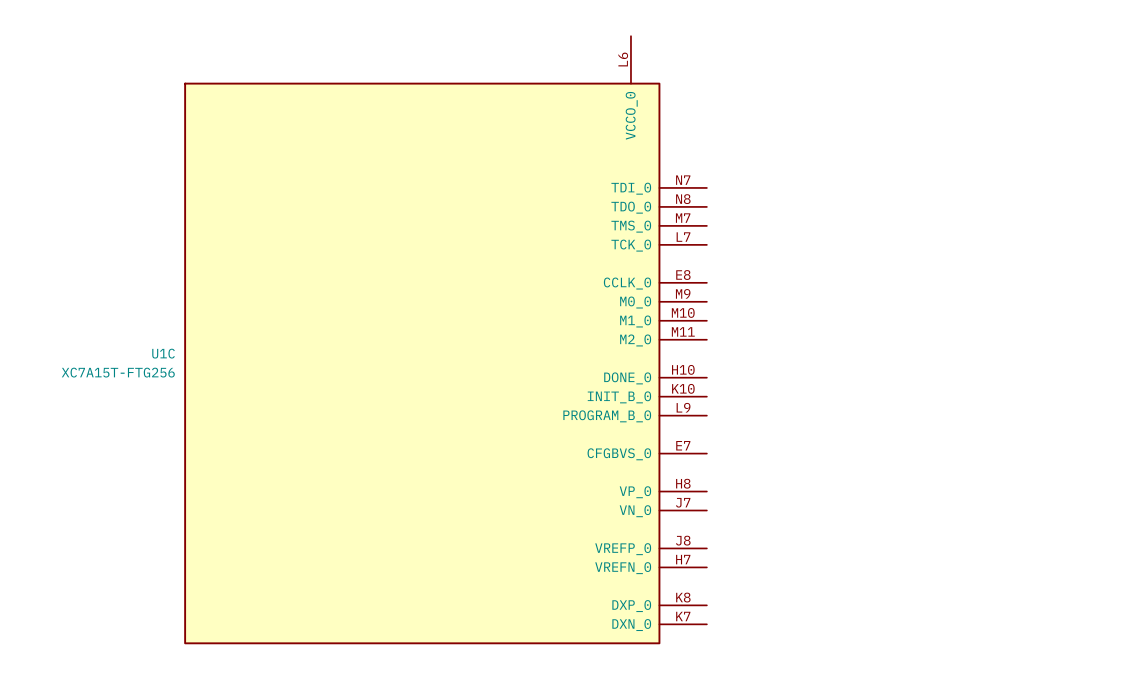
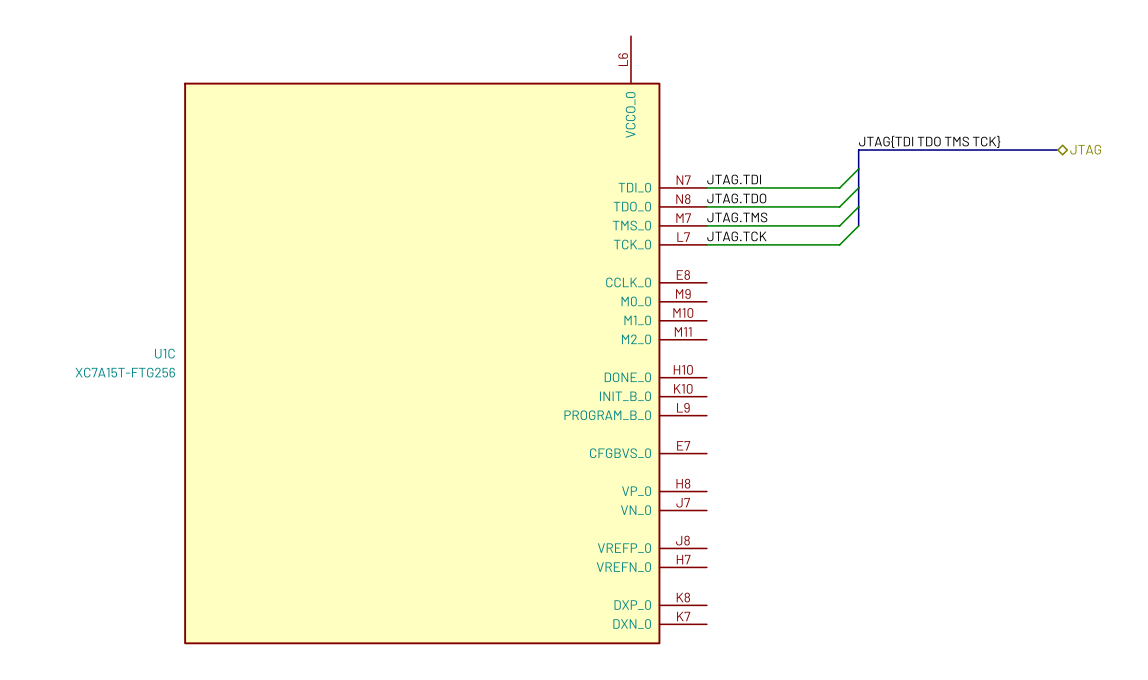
label: none -> JTAG{TDI TDO TMS TCK} (929, 141)
hierarchical label: none -> JTAG (1085, 149)
bus: none -> (1057, 150) (858, 150) (858, 225)
wire: none -> (858, 168) (839, 187) (706, 187)
label: none -> JTAG.TDI (734, 179)
wire: none -> (858, 187) (839, 206) (706, 206)
label: none -> JTAG.TDO (736, 198)
wire: none -> (858, 206) (839, 225) (706, 225)
label: none -> JTAG.TMS (737, 217)
wire: none -> (858, 225) (839, 244) (706, 244)
label: none -> JTAG.TCK (736, 236)

